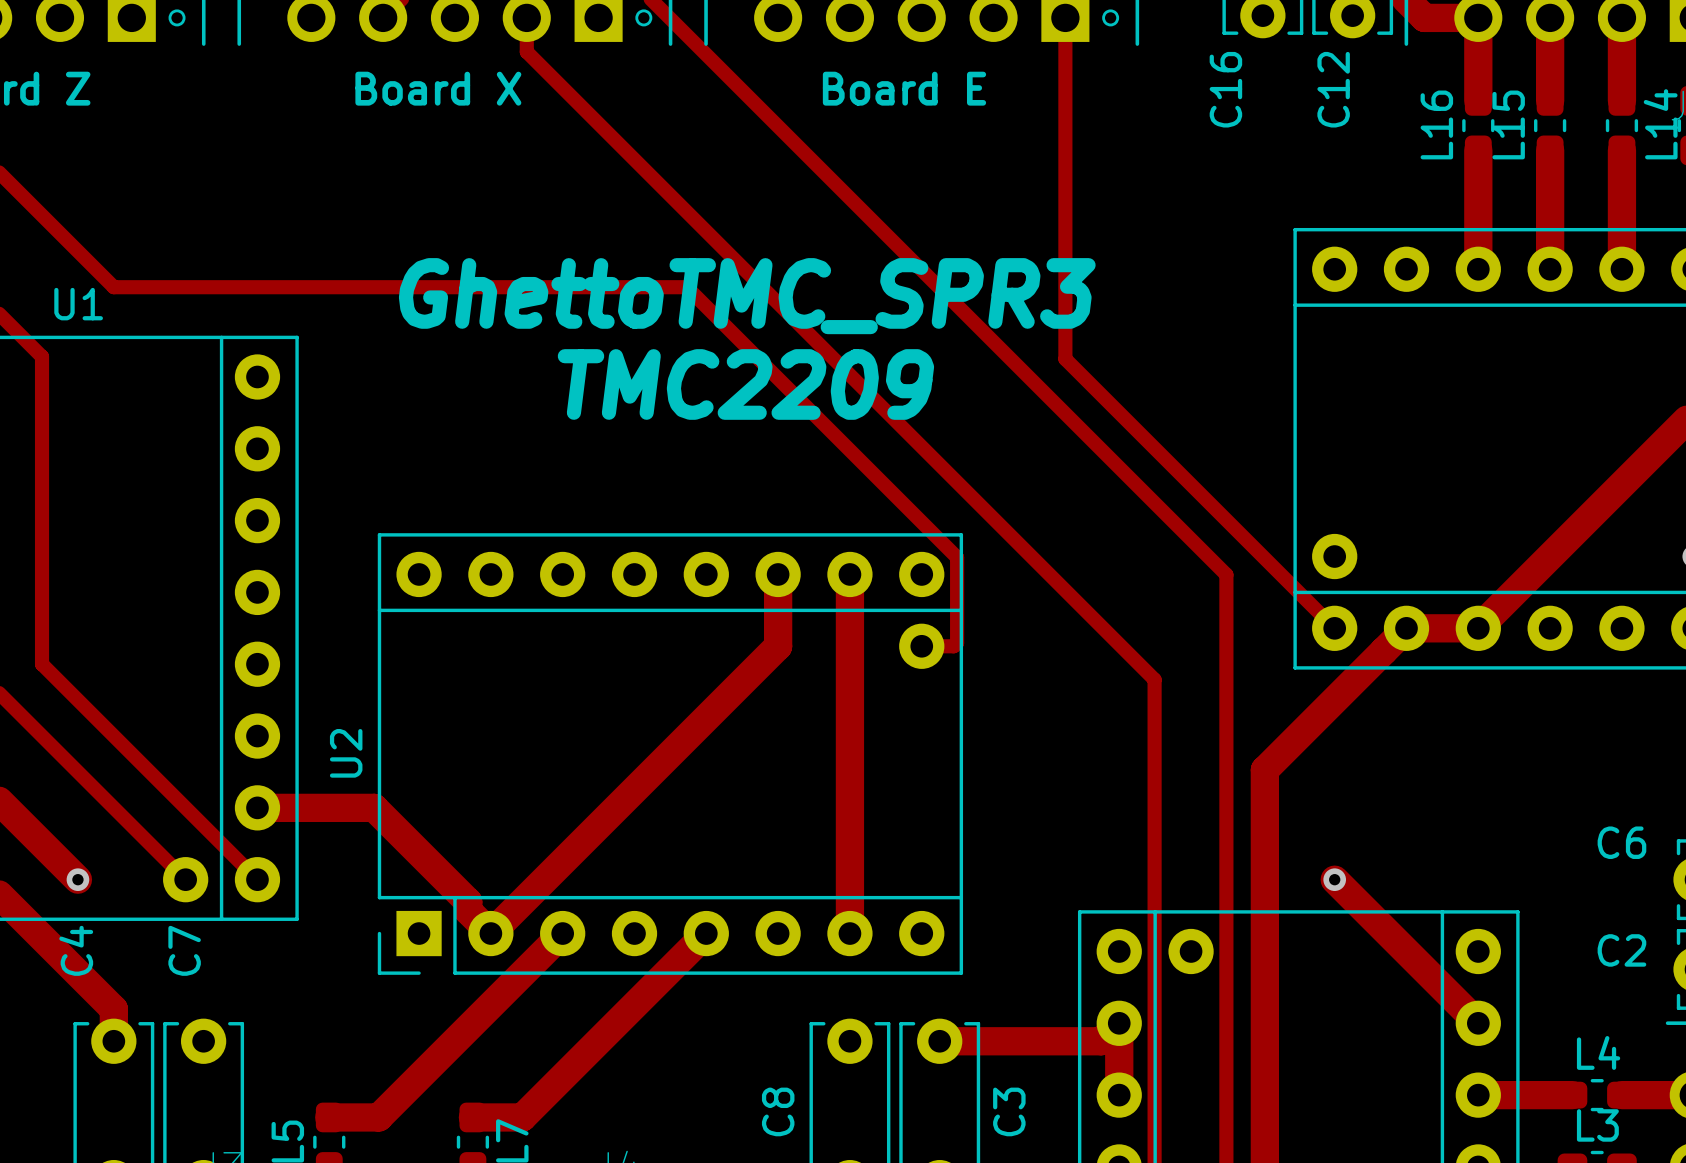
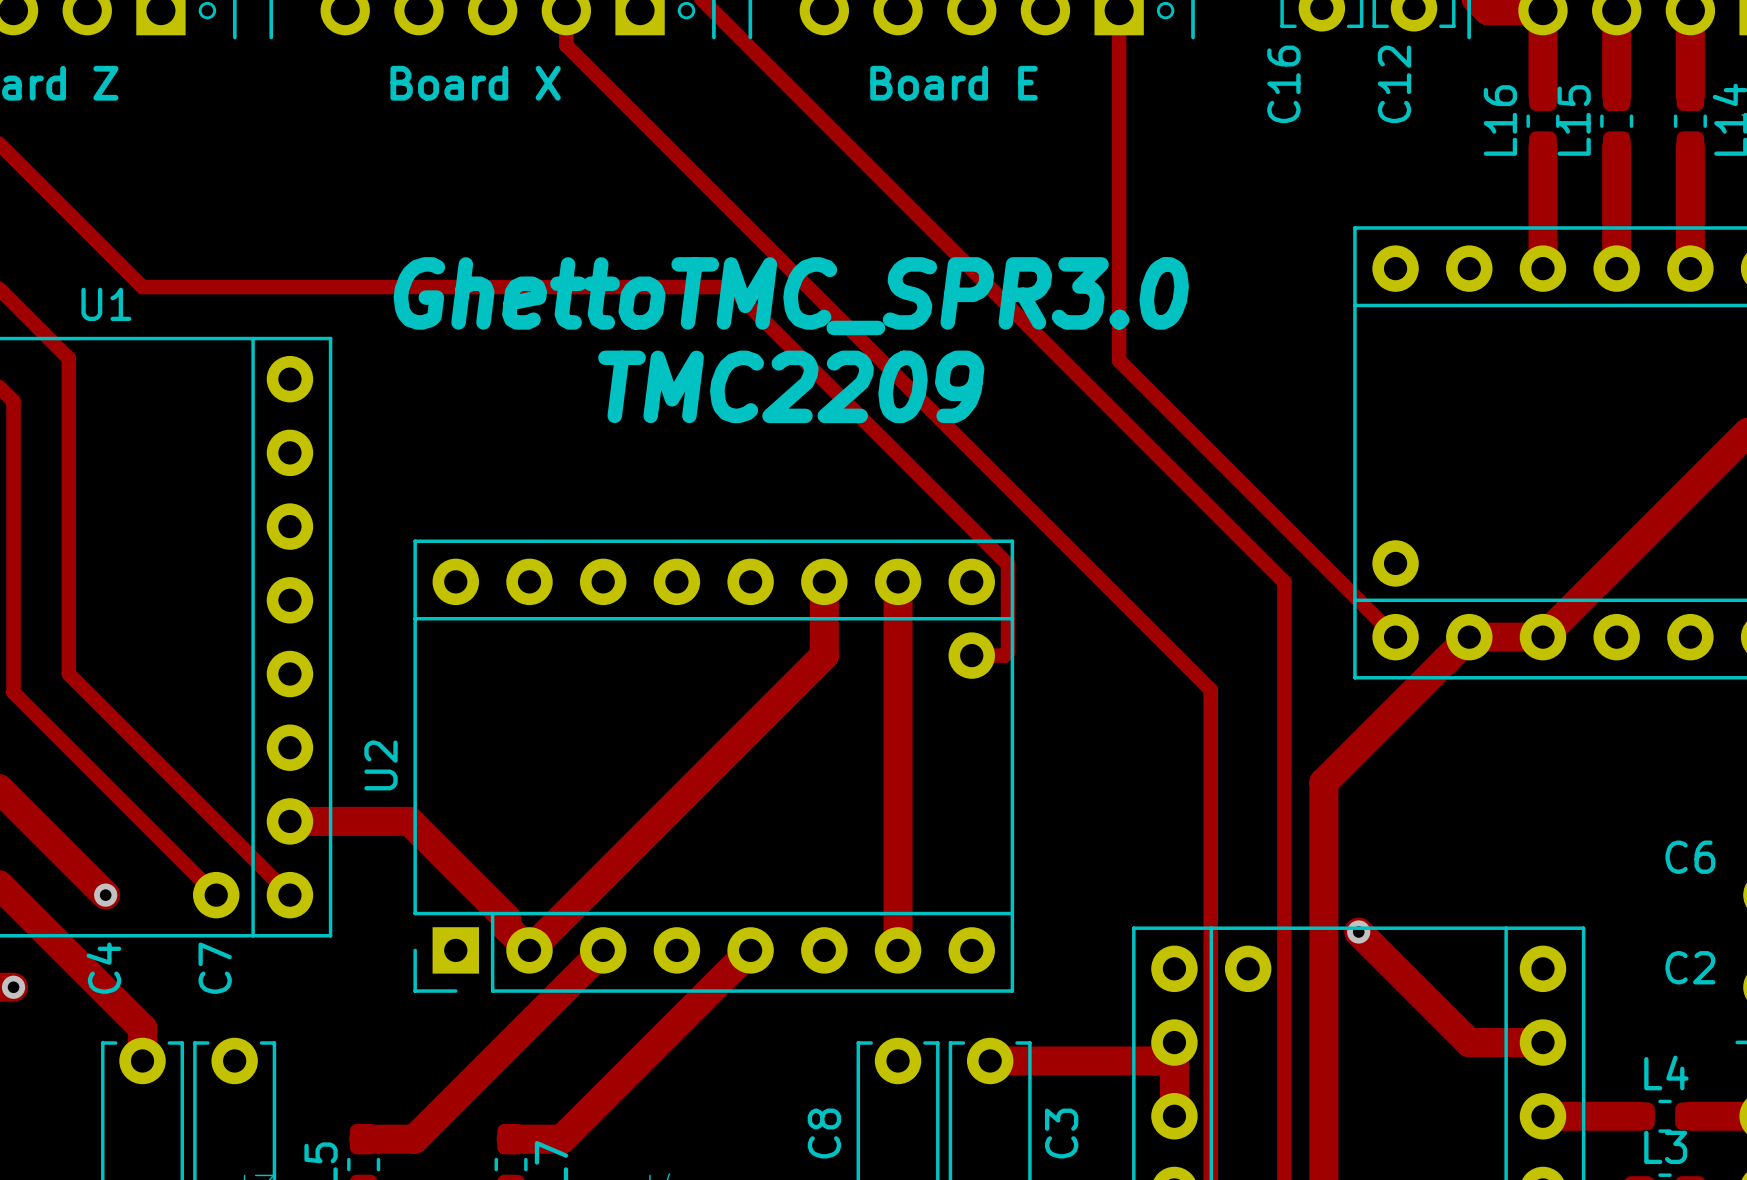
text: GhettoTMC_SPR3 (747, 296) -> GhettoTMC_SPR3.0 (791, 296)
track: (1334, 879) (1478, 1023) -> (1358, 931) (1469, 1042) (1542, 1042)
via position: (1334, 879) -> (1358, 931)

